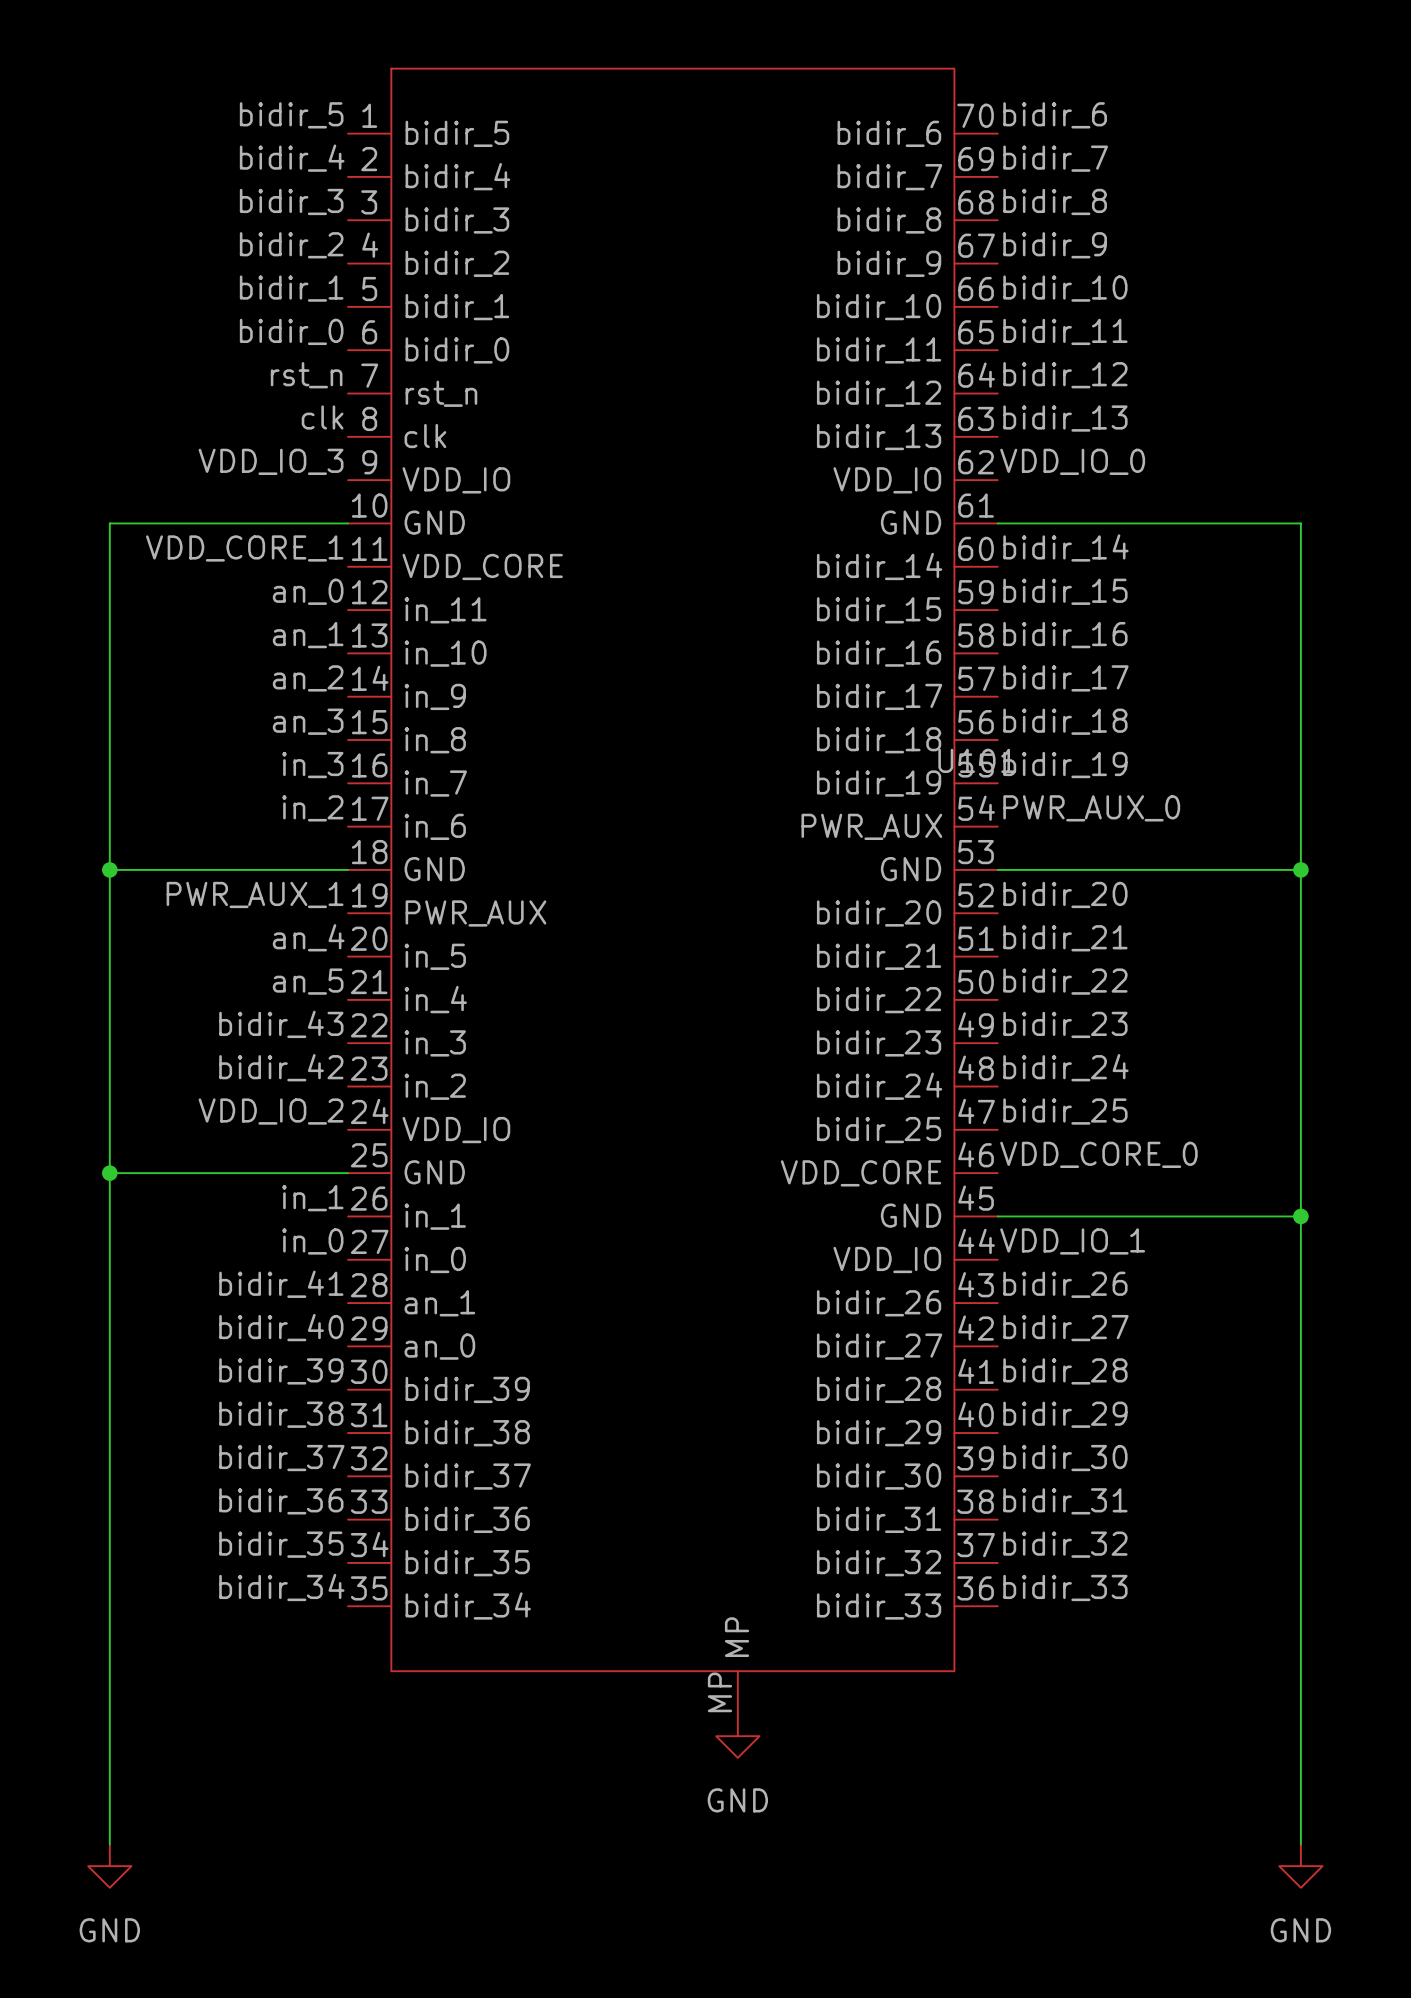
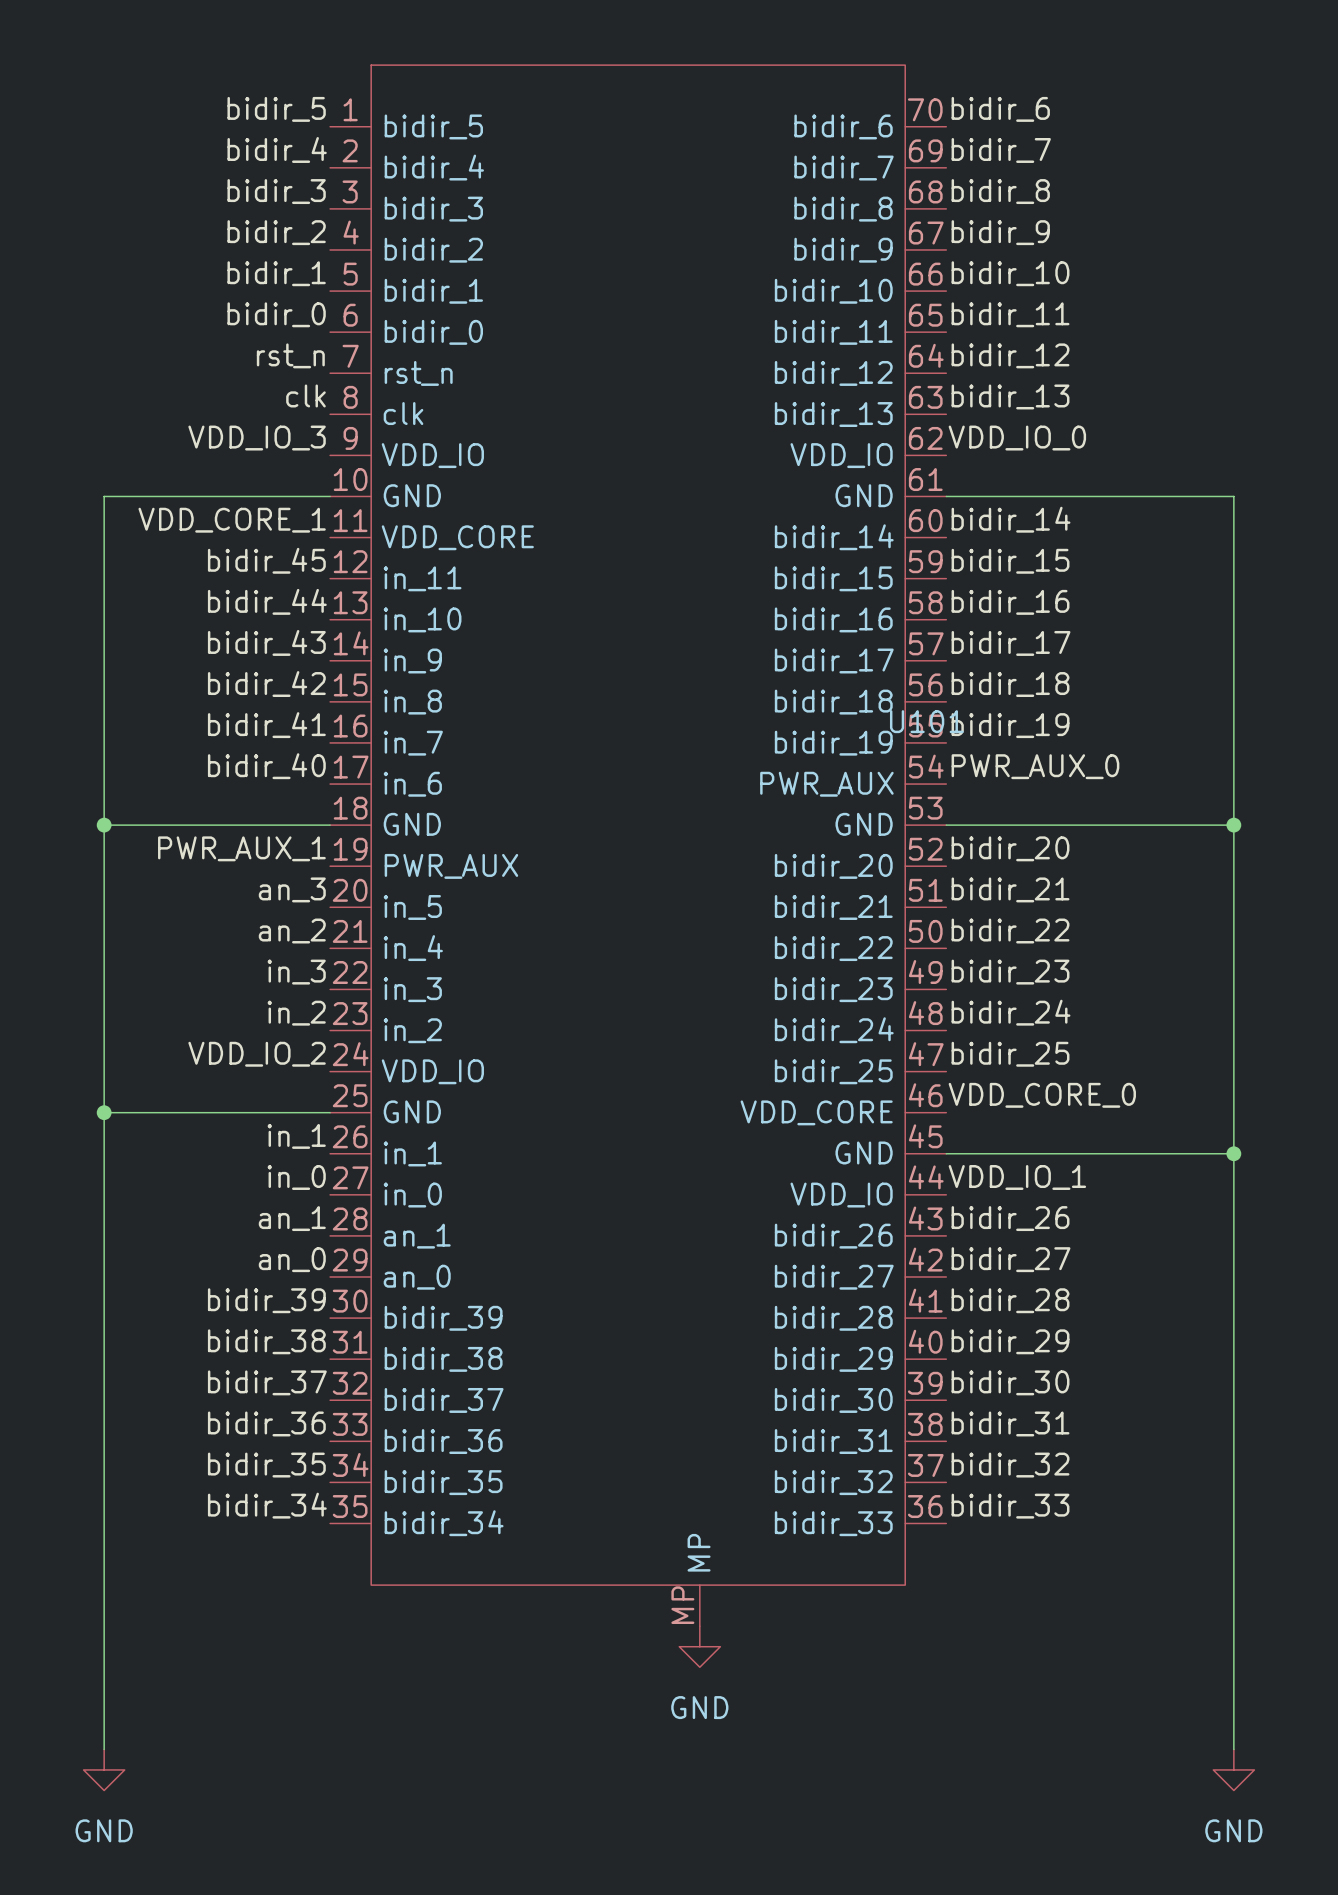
label: an_0 (308, 591) -> bidir_45 (266, 560)
label: an_1 (308, 635) -> bidir_44 (267, 601)
label: an_2 (308, 678) -> bidir_43 (266, 642)
label: an_3 (308, 721) -> bidir_42 (266, 684)
label: in_3 (312, 765) -> bidir_41 (266, 725)
label: in_2 (312, 808) -> bidir_40 (266, 766)
label: an_4 (308, 937) -> an_3 (292, 889)
label: an_5 (308, 981) -> an_2 (292, 931)
label: bidir_43 (281, 1024) -> in_3 (296, 972)
label: bidir_42 (281, 1067) -> in_2 (296, 1013)
label: bidir_41 (281, 1284) -> an_1 (292, 1218)
label: bidir_40 (281, 1327) -> an_0 (292, 1259)

